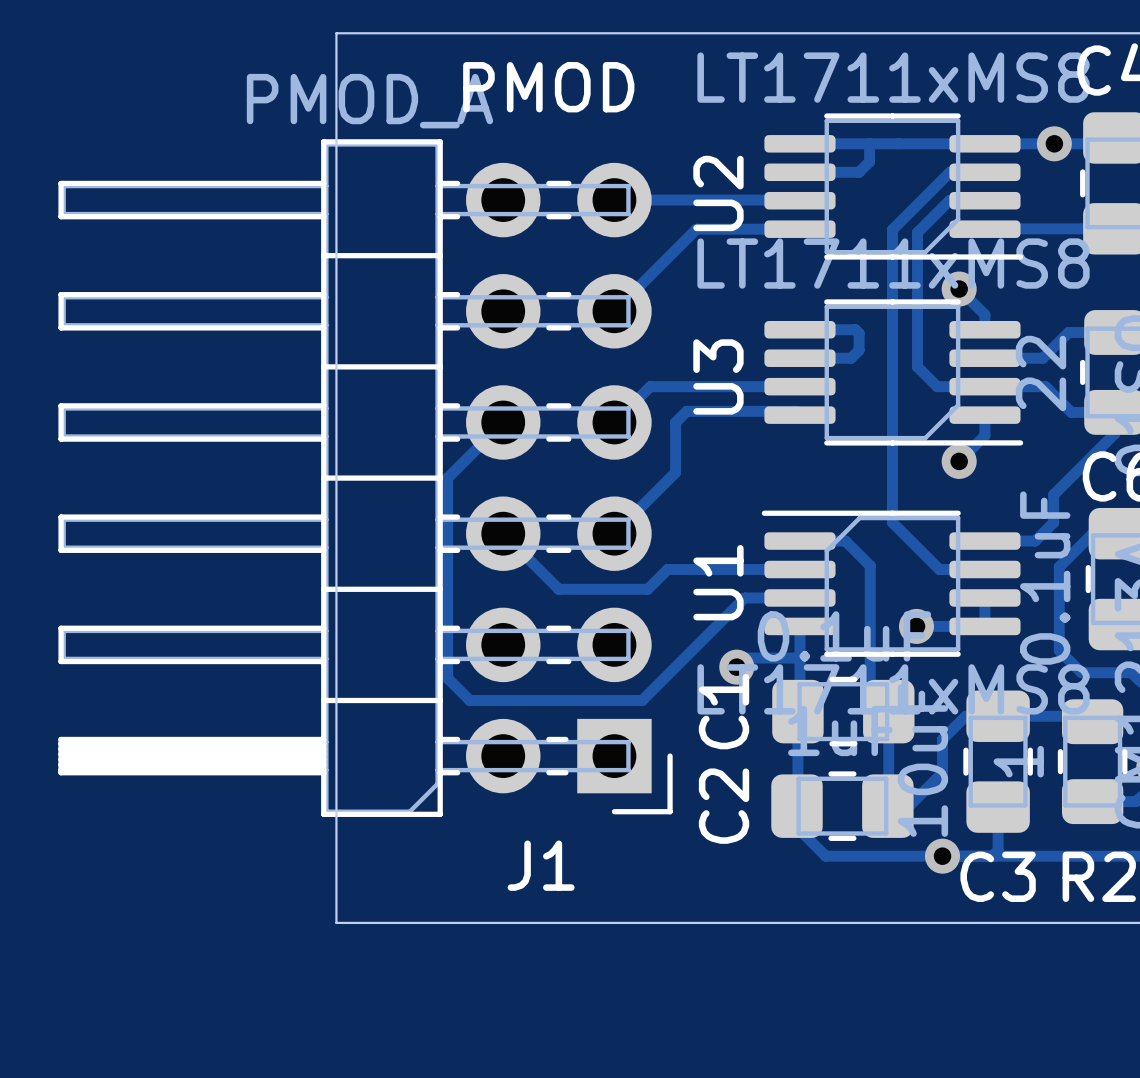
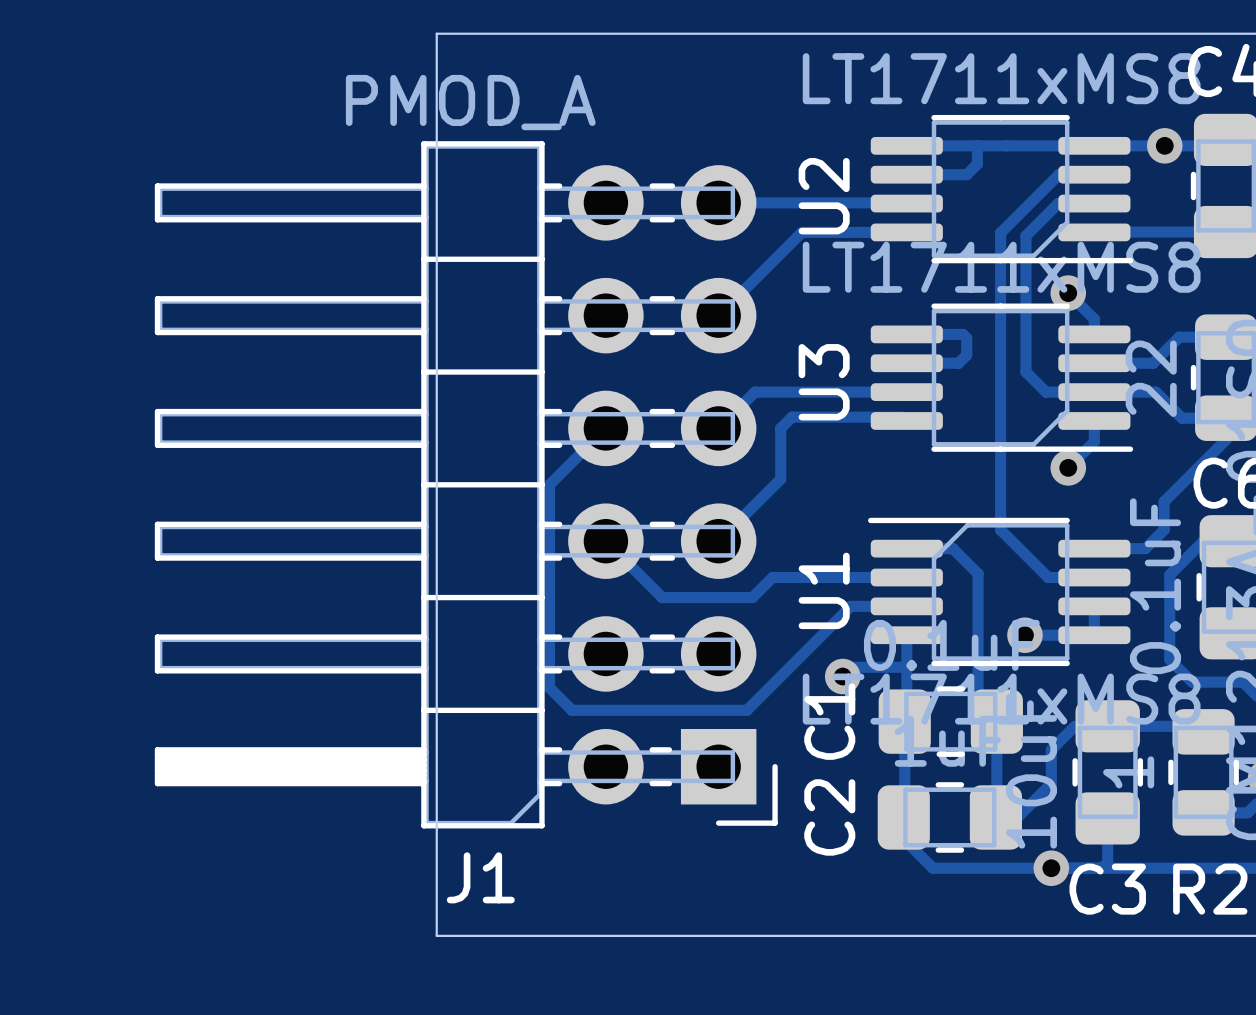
text: PMOD (548, 87) -> none
J1 name position: J1 (541, 865) -> J1 (480, 877)

